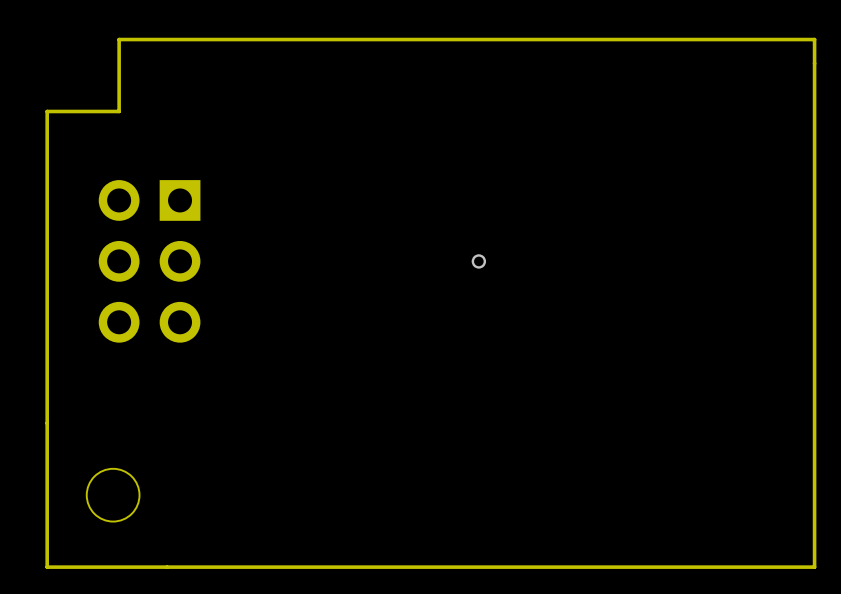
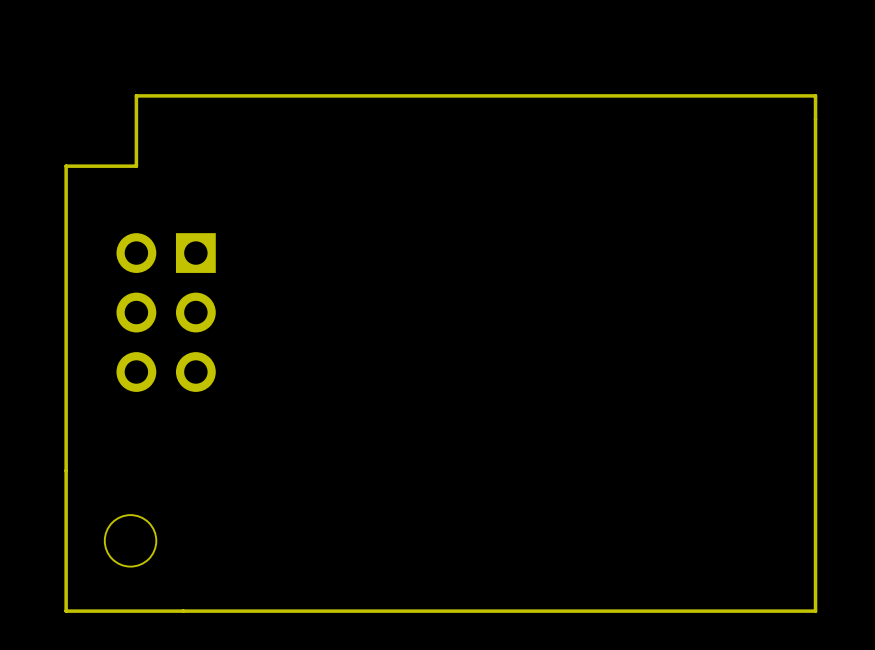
via: (478, 261) -> none

